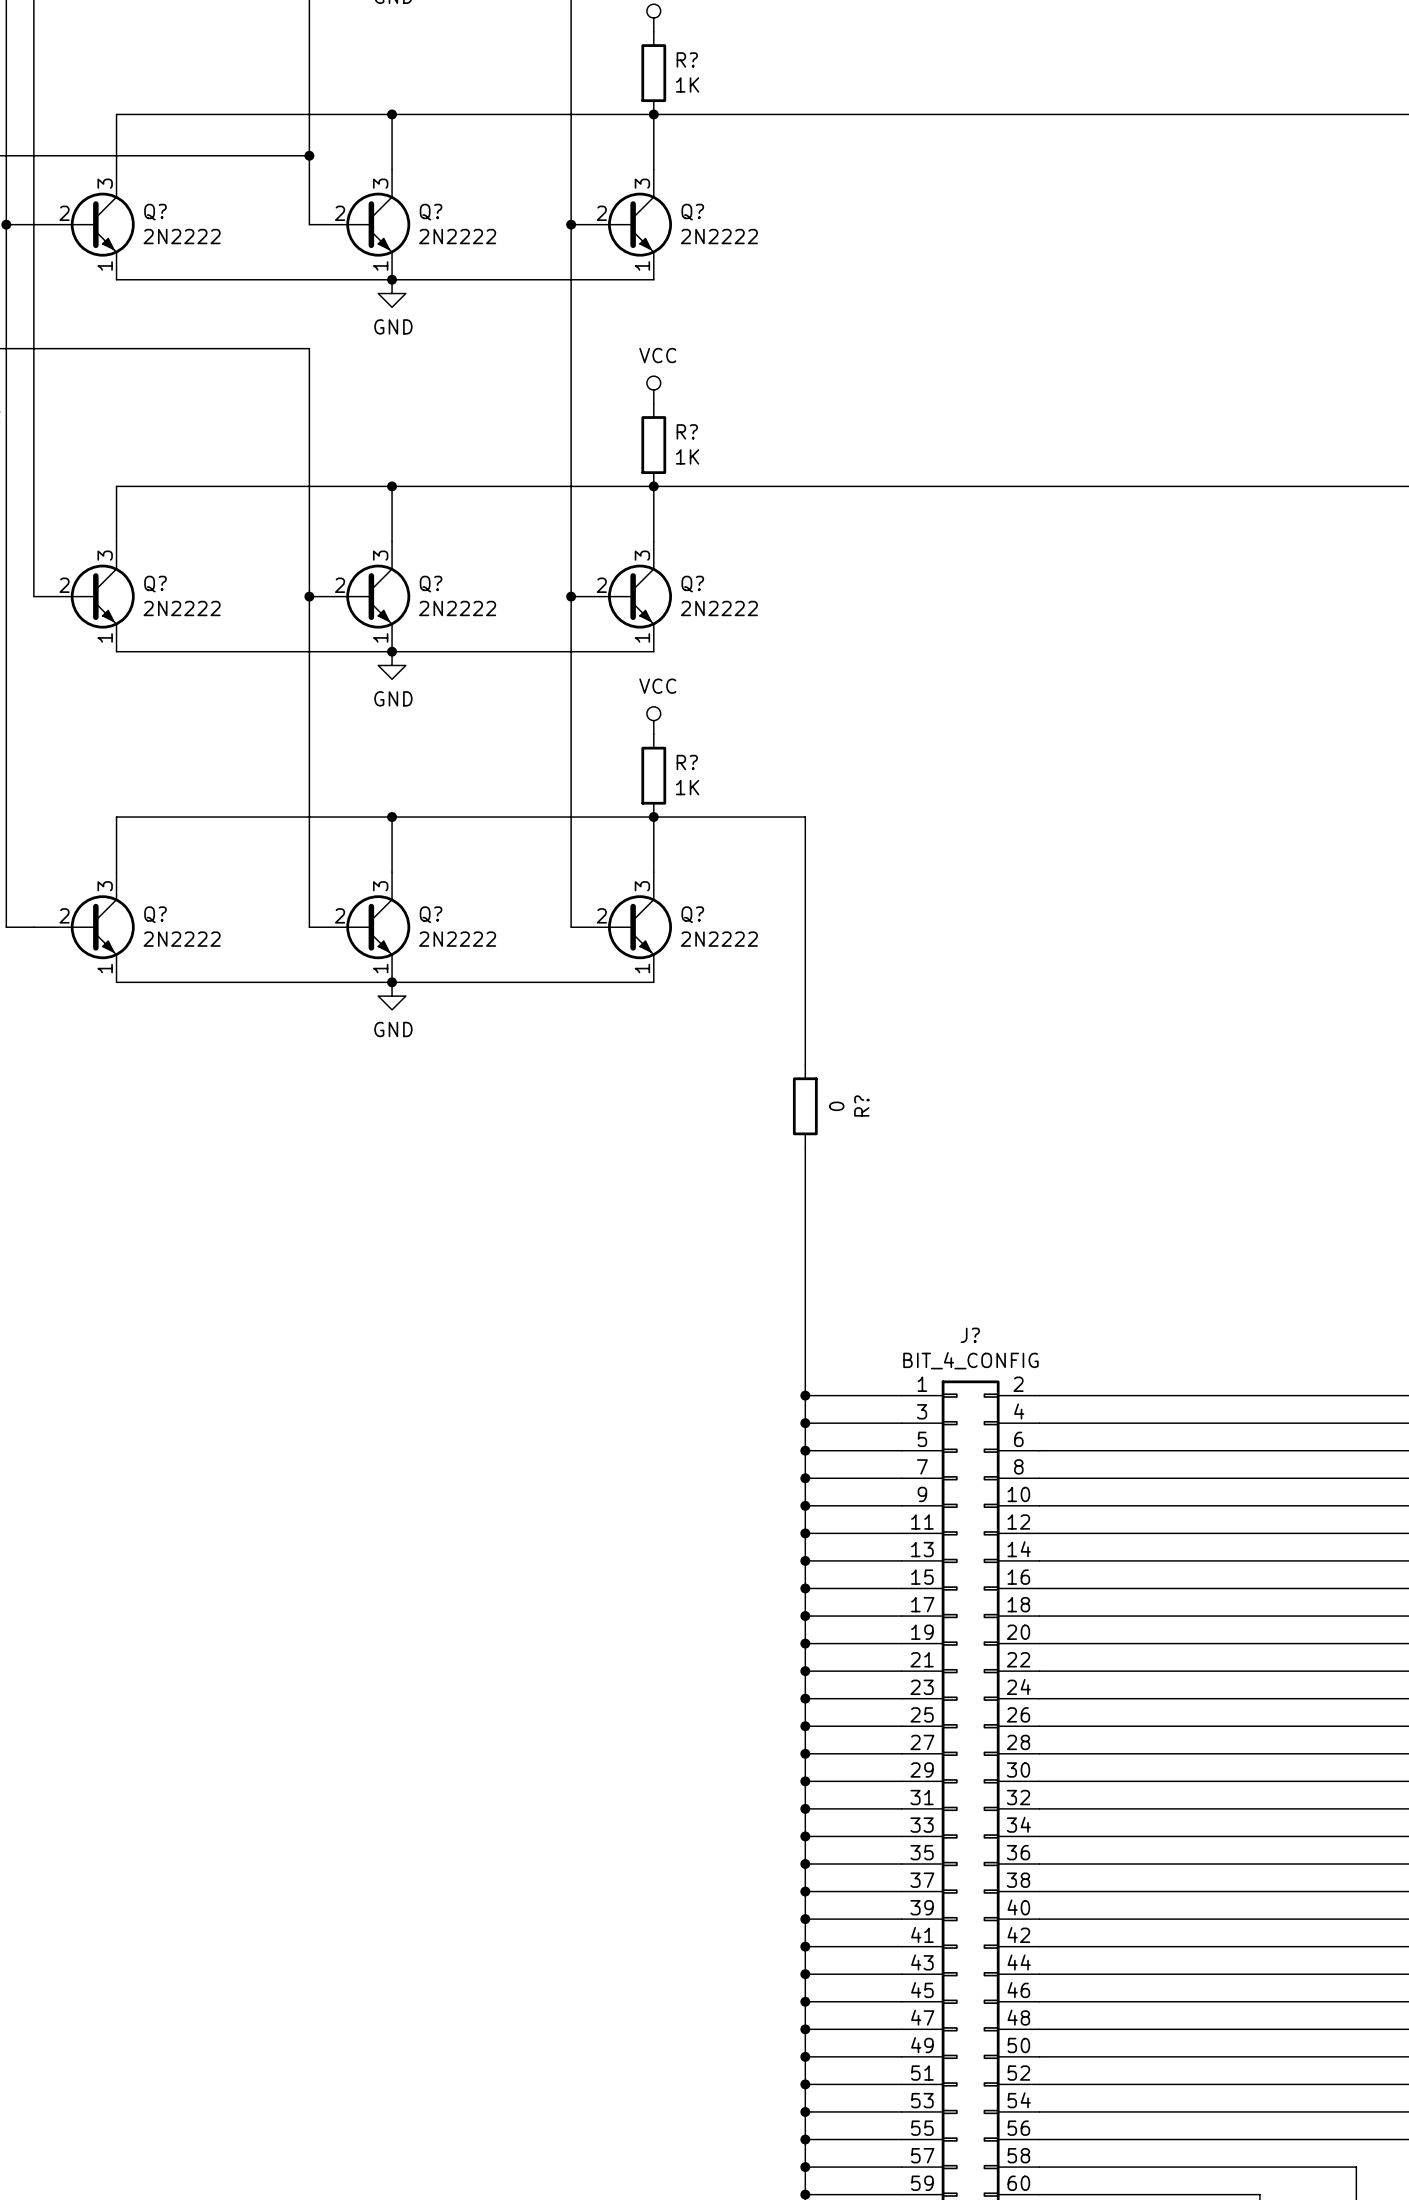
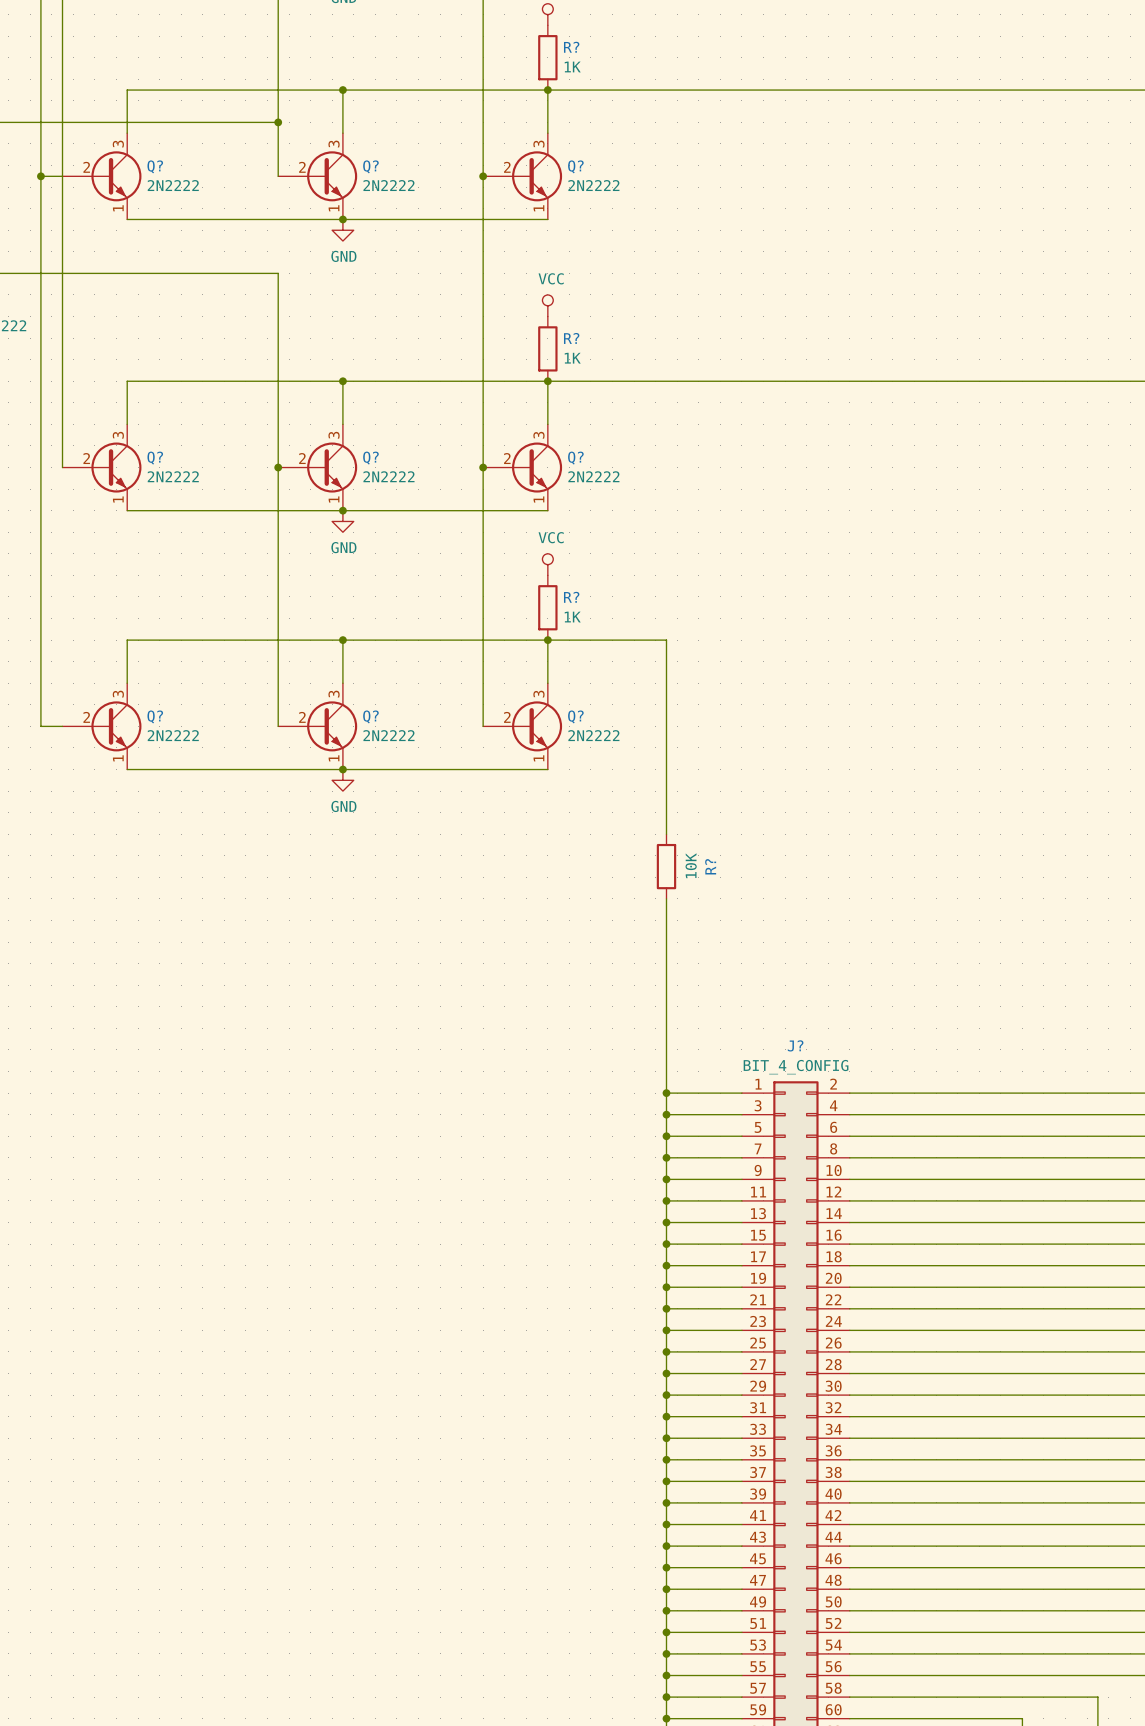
R? value: 0 (836, 1106) -> 10K (691, 865)

